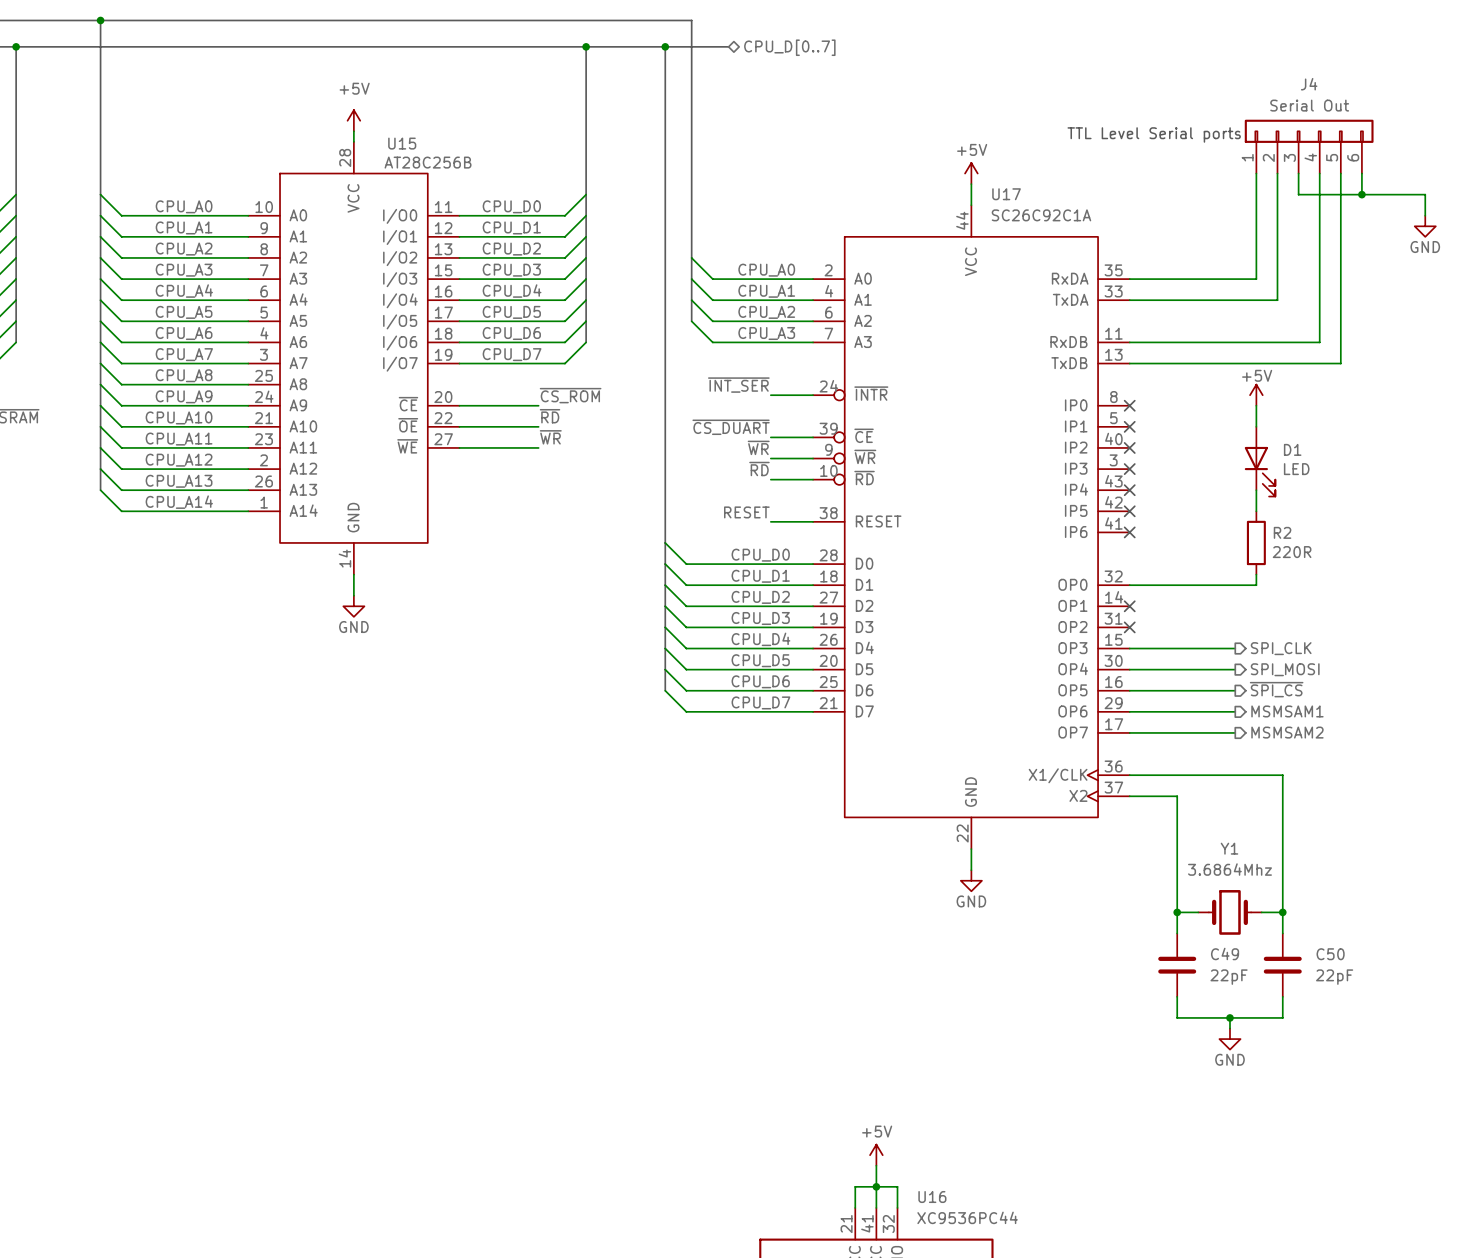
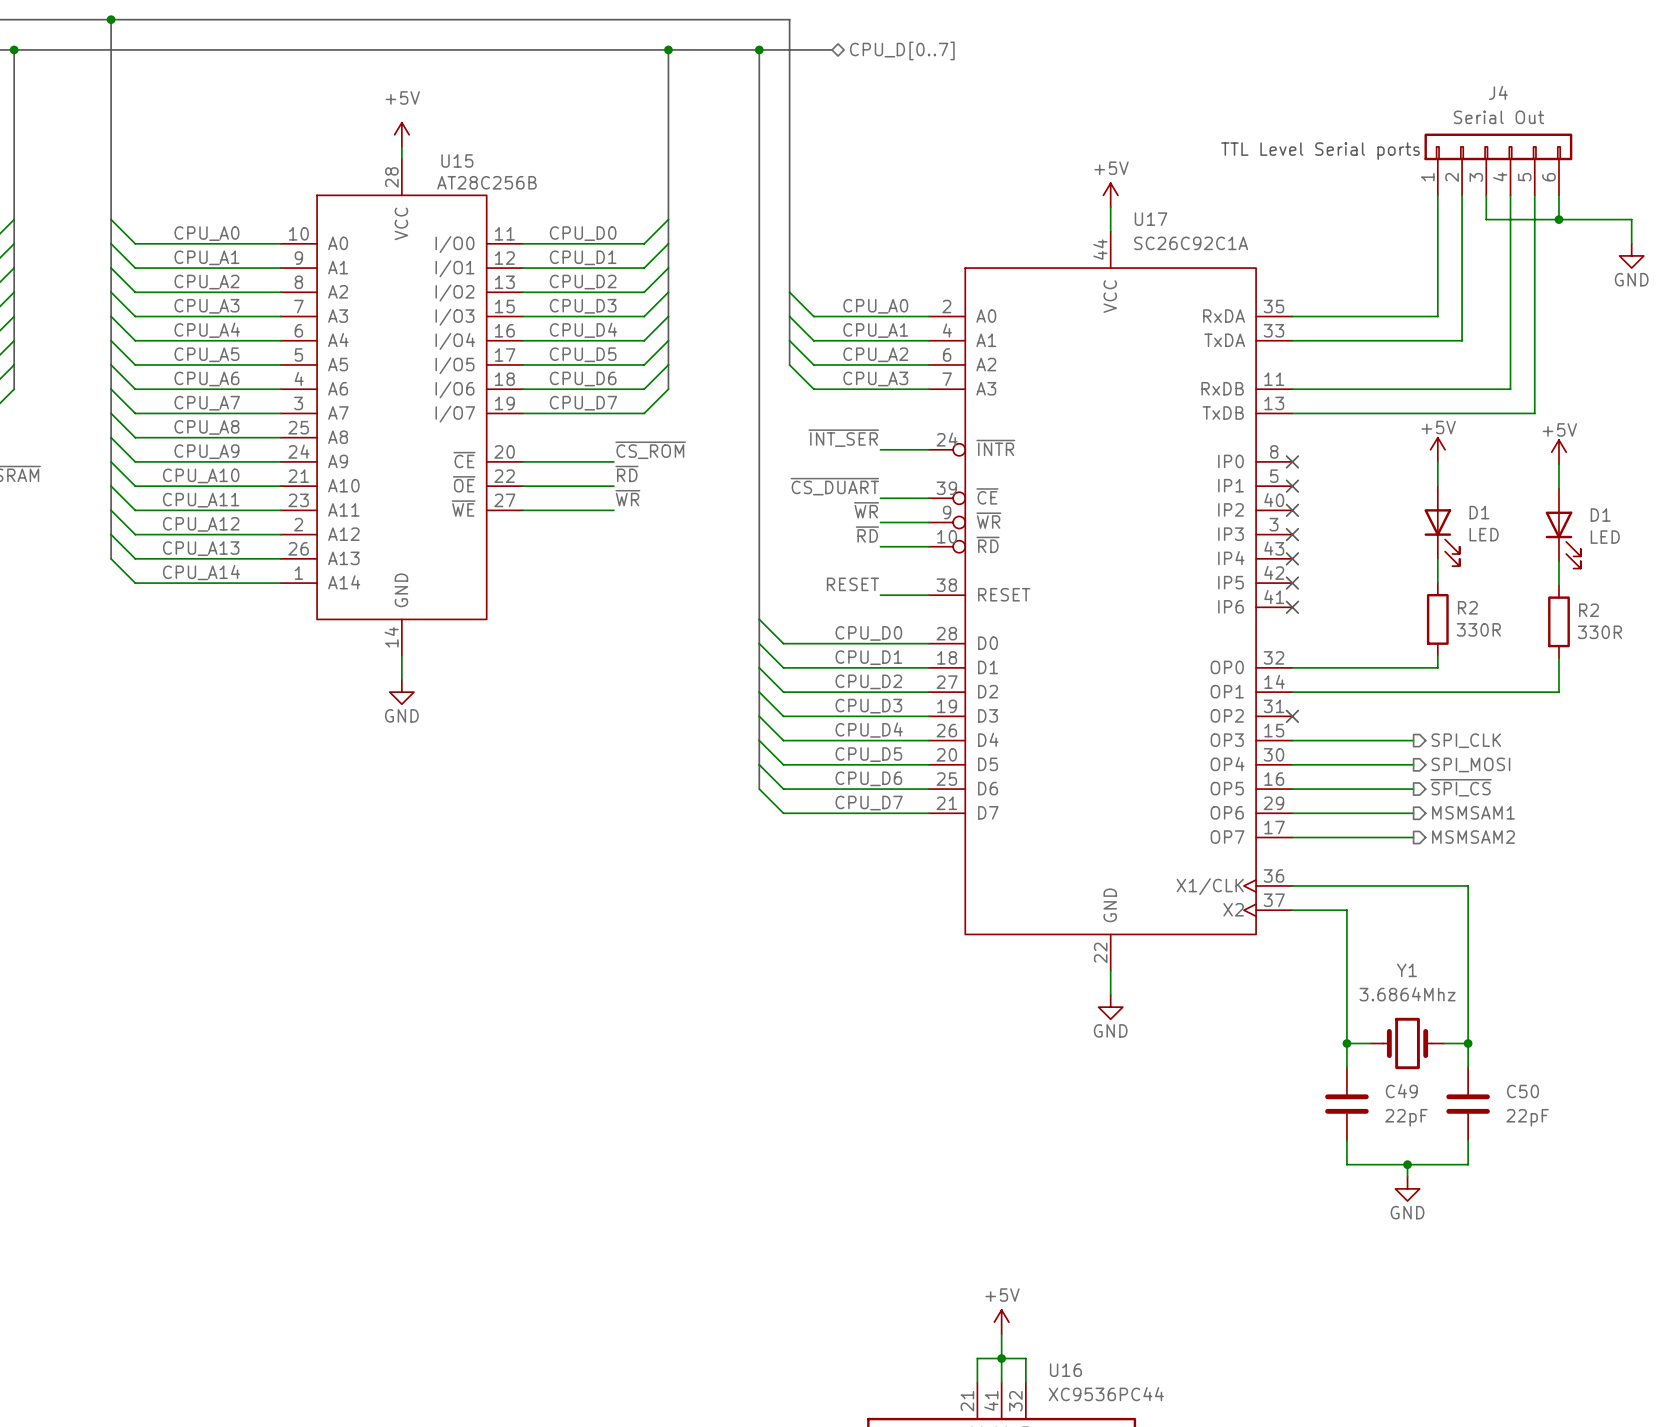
power symbol: none -> +5V (1558, 452)
wire: none -> (1558, 464) (1558, 488)
D1: none -> LED (1563, 528)
wire: none -> (1558, 561) (1558, 585)
R2: none -> 330R (1558, 621)
R2 value: 220R (1292, 552) -> 330R (1478, 629)
wire: none -> (1558, 658) (1558, 692) (1292, 692)
no-connect mark: (1129, 606) -> none

